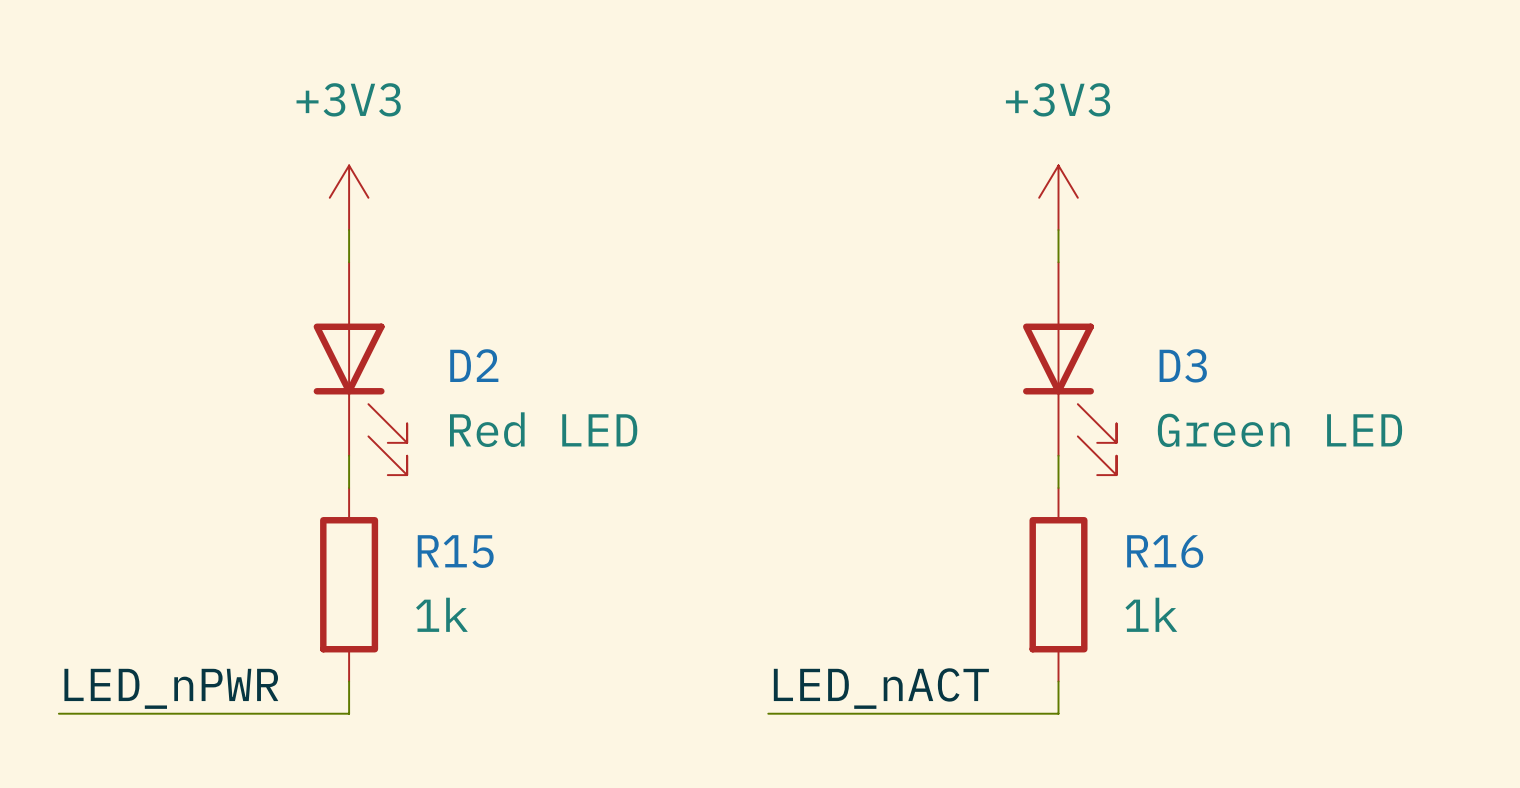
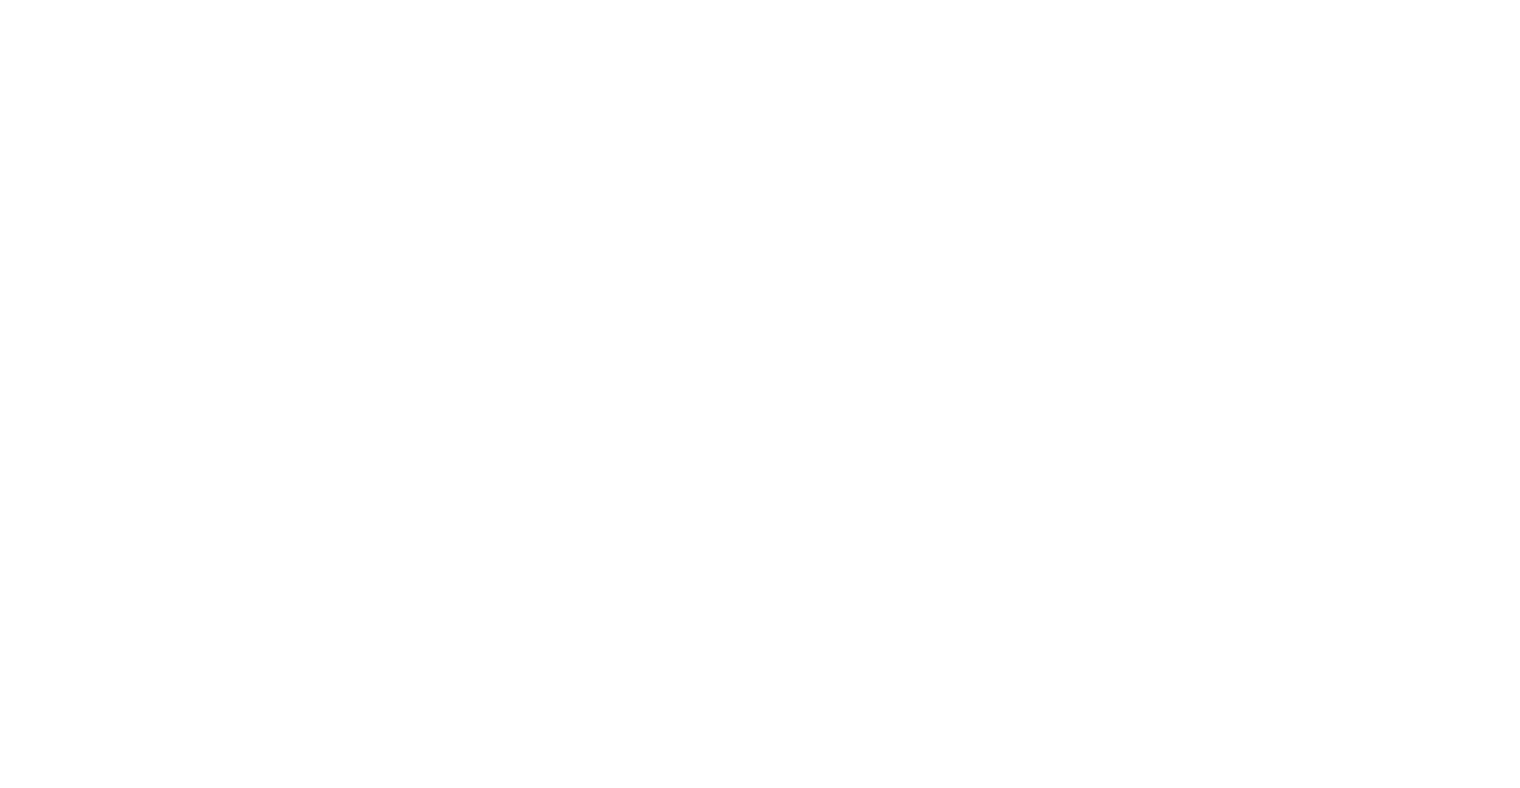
power symbol: +3V3 (349, 197) -> none
power symbol: +3V3 (1058, 197) -> none
wire: (349, 230) (349, 262) -> none
wire: (1058, 230) (1058, 262) -> none
D2: Red LED (360, 368) -> none
D3: Green LED (1069, 368) -> none
wire: (349, 455) (349, 488) -> none
wire: (1058, 455) (1058, 488) -> none
R15: 1k (349, 584) -> none
R16: 1k (1058, 584) -> none
wire: (349, 681) (349, 713) (58, 713) -> none
wire: (1058, 681) (1058, 713) (768, 713) -> none
label: LED_nPWR (171, 688) -> none
label: LED_nACT (881, 688) -> none

